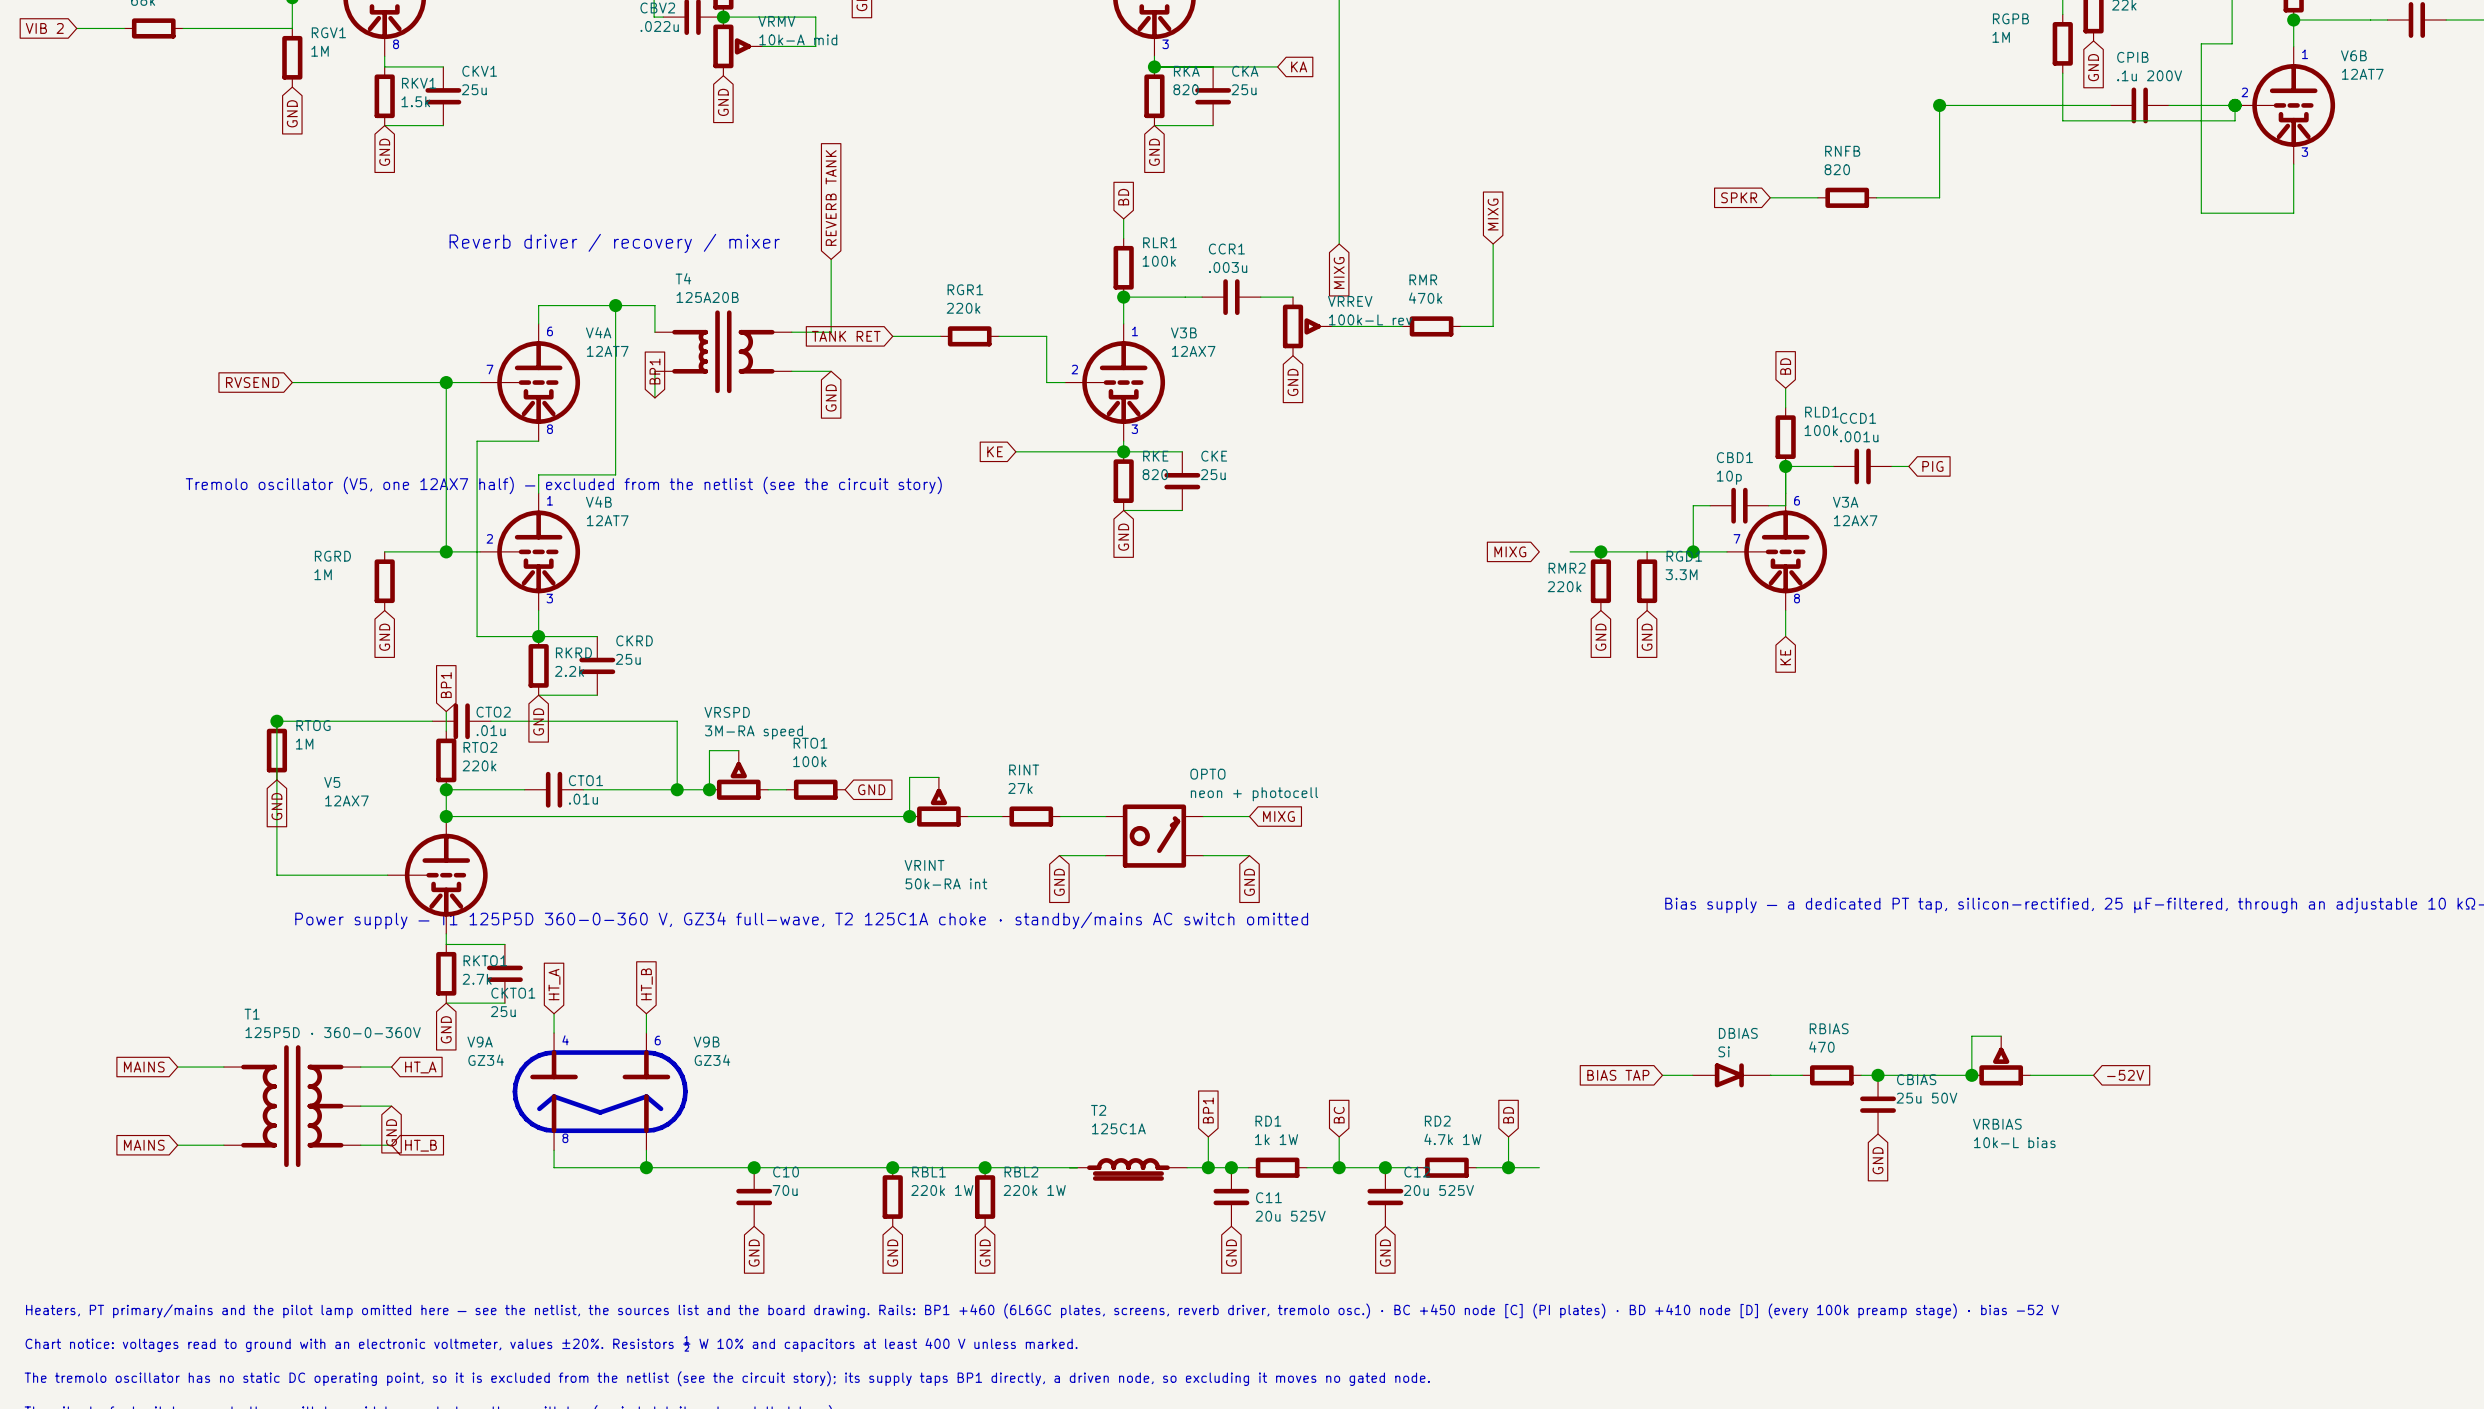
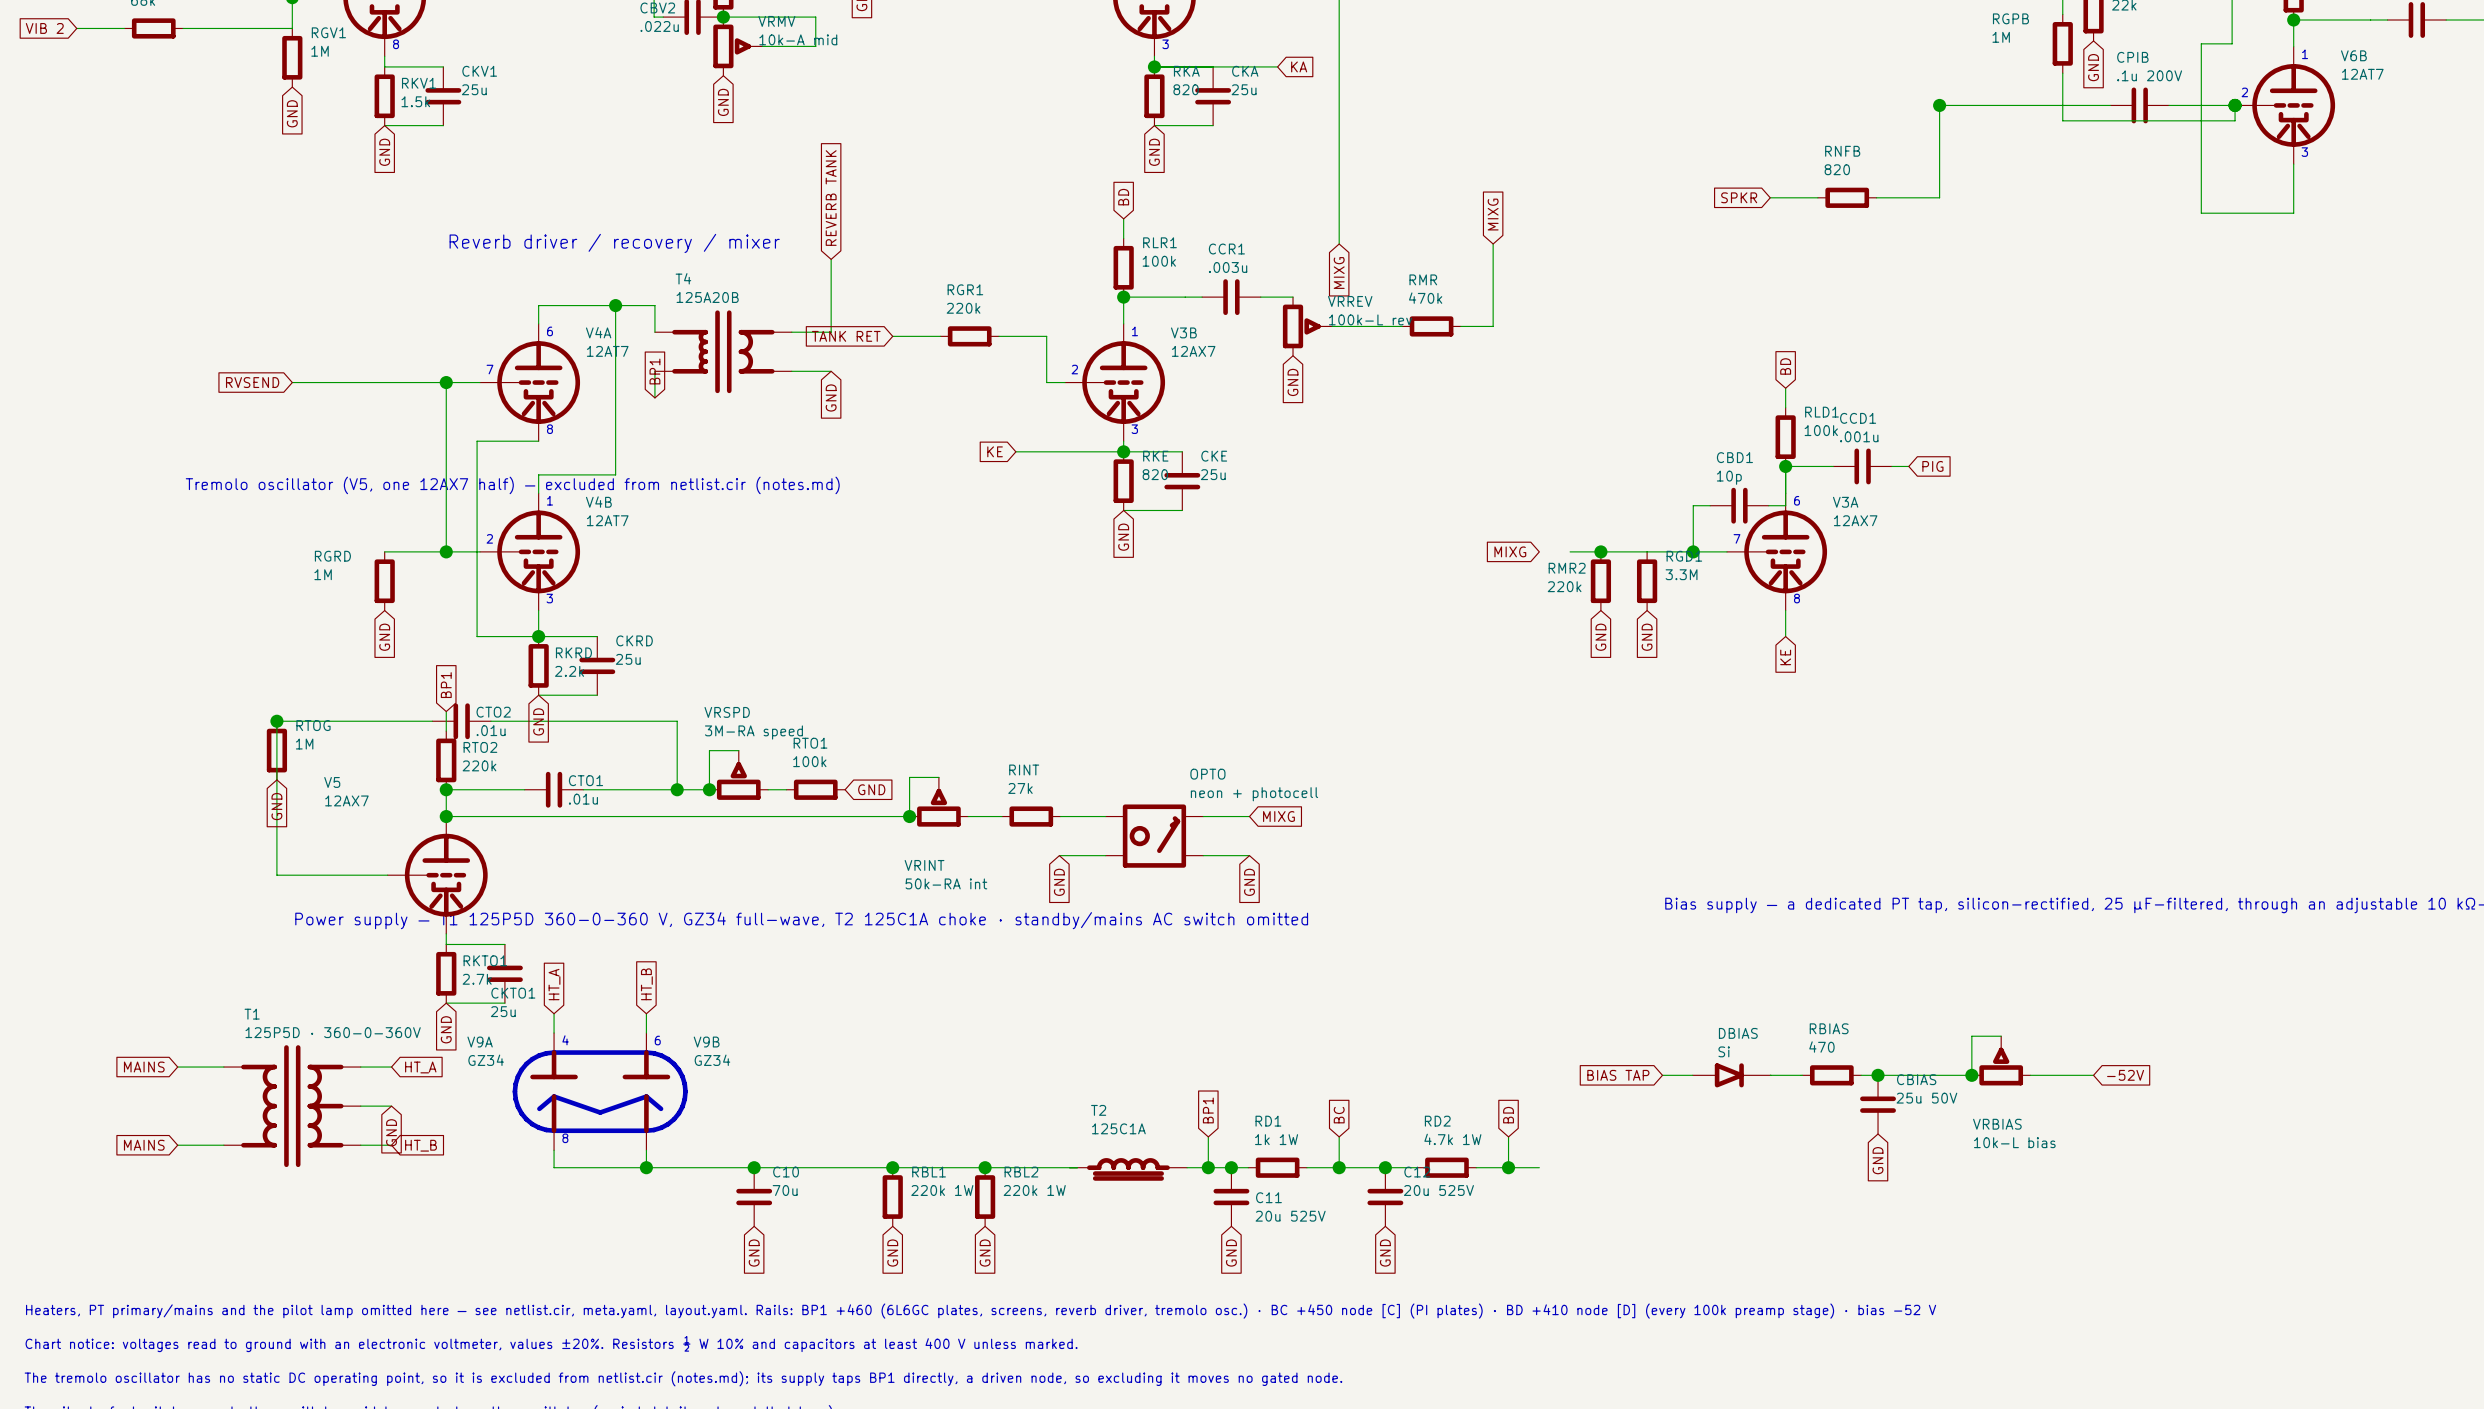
text: Tremolo oscillator (V5, one 12AX7 half) — excluded from the netlist (see the circuit story) (563, 485) -> Tremolo oscillator (V5, one 12AX7 half) — excluded from netlist.cir (notes.md) (512, 485)
text: Heaters, PT primary/mains and the pilot lamp omitted here — see the netlist, the sources list and the board drawing. Rails: BP1 +460 (6L6GC plates, screens, reverb driver, tremolo osc.) · BC +450 node [C] (PI plates) · BD +410 node [D] (every 100k preamp stage) · bias -52 V (1042, 1311) -> Heaters, PT primary/mains and the pilot lamp omitted here — see netlist.cir, meta.yaml, layout.yaml. Rails: BP1 +460 (6L6GC plates, screens, reverb driver, tremolo osc.) · BC +450 node [C] (PI plates) · BD +410 node [D] (every 100k preamp stage) · bias -52 V (981, 1311)
text: The tremolo oscillator has no static DC operating point, so it is excluded from the netlist (see the circuit story); its supply taps BP1 directly, a driven node, so excluding it moves no gated node. (727, 1378) -> The tremolo oscillator has no static DC operating point, so it is excluded from netlist.cir (notes.md); its supply taps BP1 directly, a driven node, so excluding it moves no gated node. (683, 1378)

